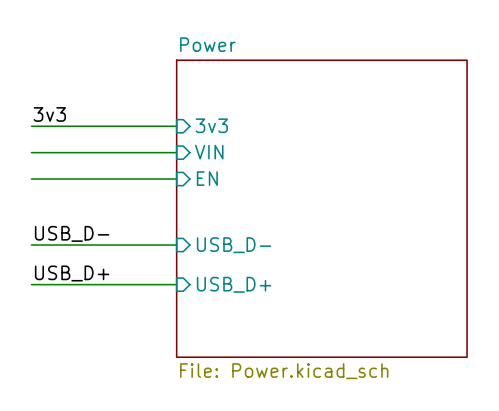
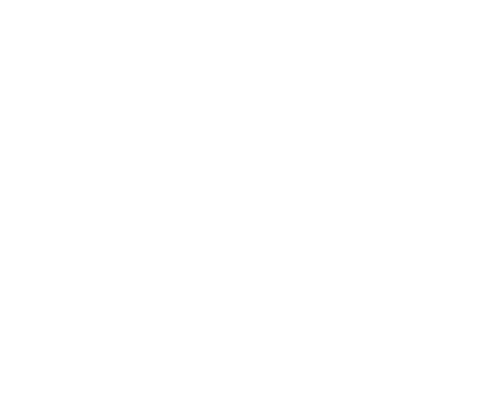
label: 3v3 (49, 114) -> none
sheet pin: 3v3 (211, 125) -> none
wire: (31, 126) (176, 126) -> none
wire: (31, 152) (176, 152) -> none
sheet pin: VIN (209, 152) -> none
sheet pin: EN (207, 178) -> none
wire: (31, 179) (176, 179) -> none
sheet Power: File: Power.kicad_sch (321, 208) -> none
label: USB_D- (72, 233) -> none
wire: (31, 245) (176, 245) -> none
sheet pin: USB_D- (234, 245) -> none
label: USB_D+ (72, 273) -> none
wire: (31, 284) (176, 284) -> none
sheet pin: USB_D+ (234, 284) -> none

